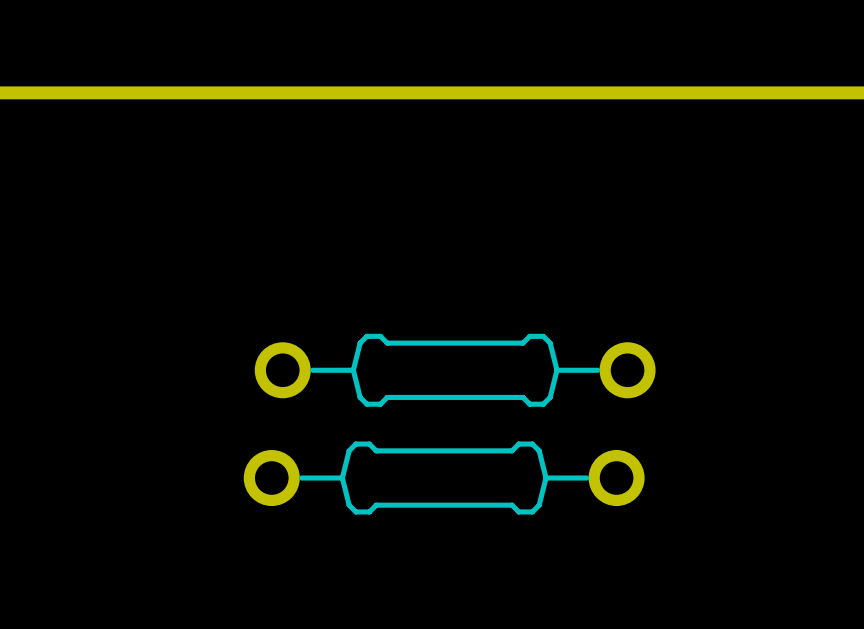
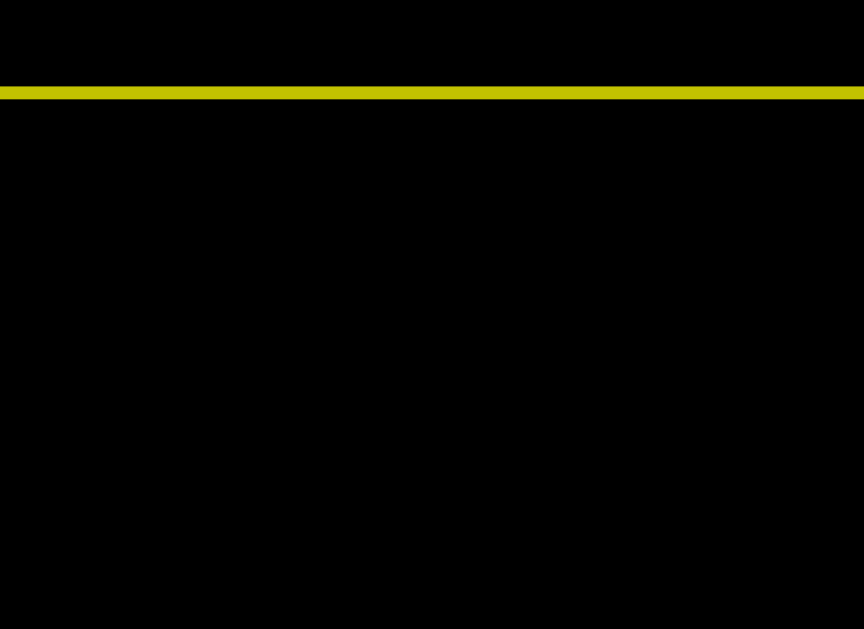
part: (455, 370) -> none
part: (444, 478) -> none

